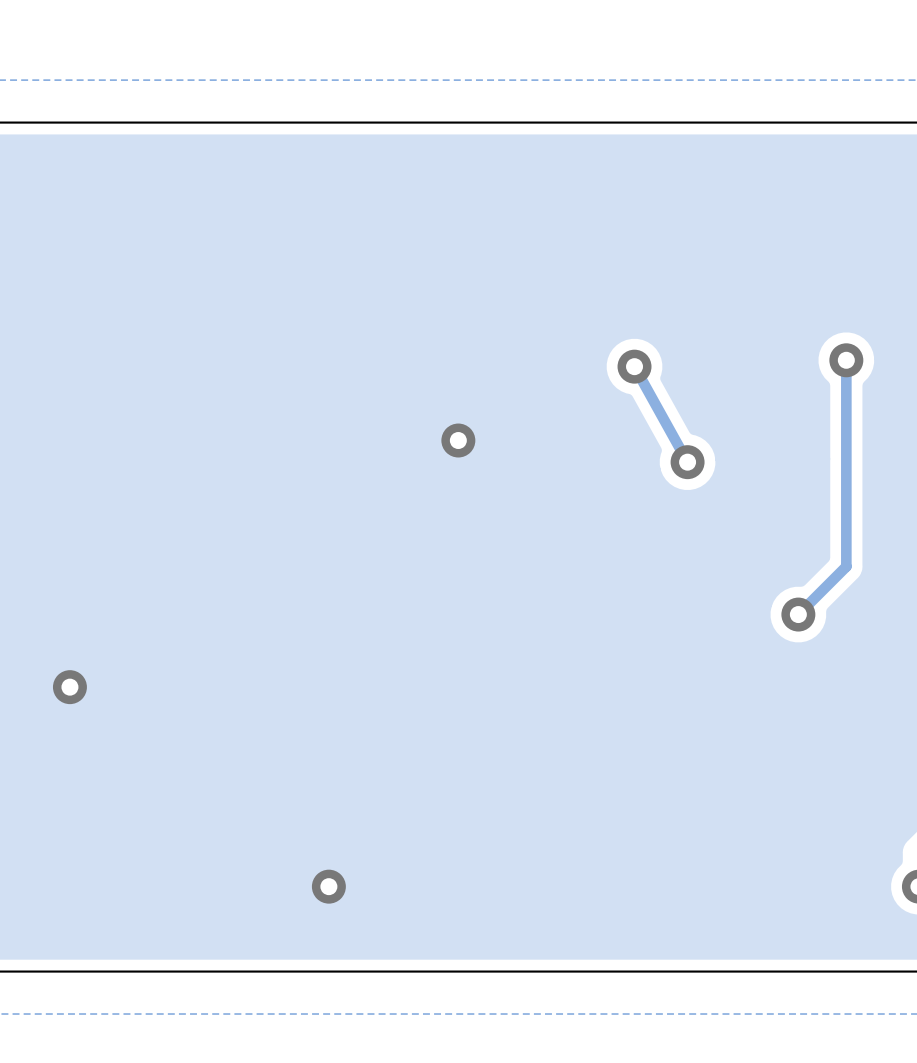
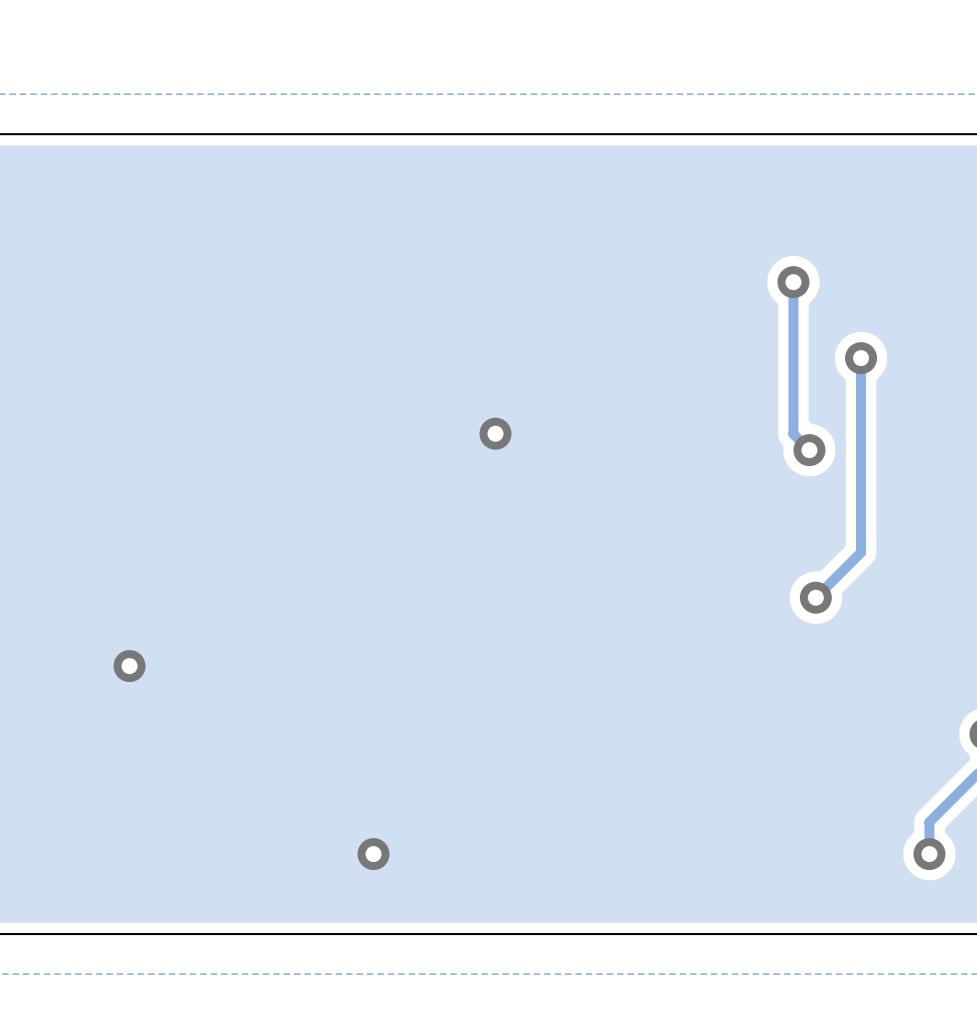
track: none -> (793, 282) (793, 434) (809, 450)
via: none -> (793, 282)
track: (634, 366) (687, 462) -> none
via: (634, 366) -> none
via: none -> (809, 450)
via: (687, 462) -> none

